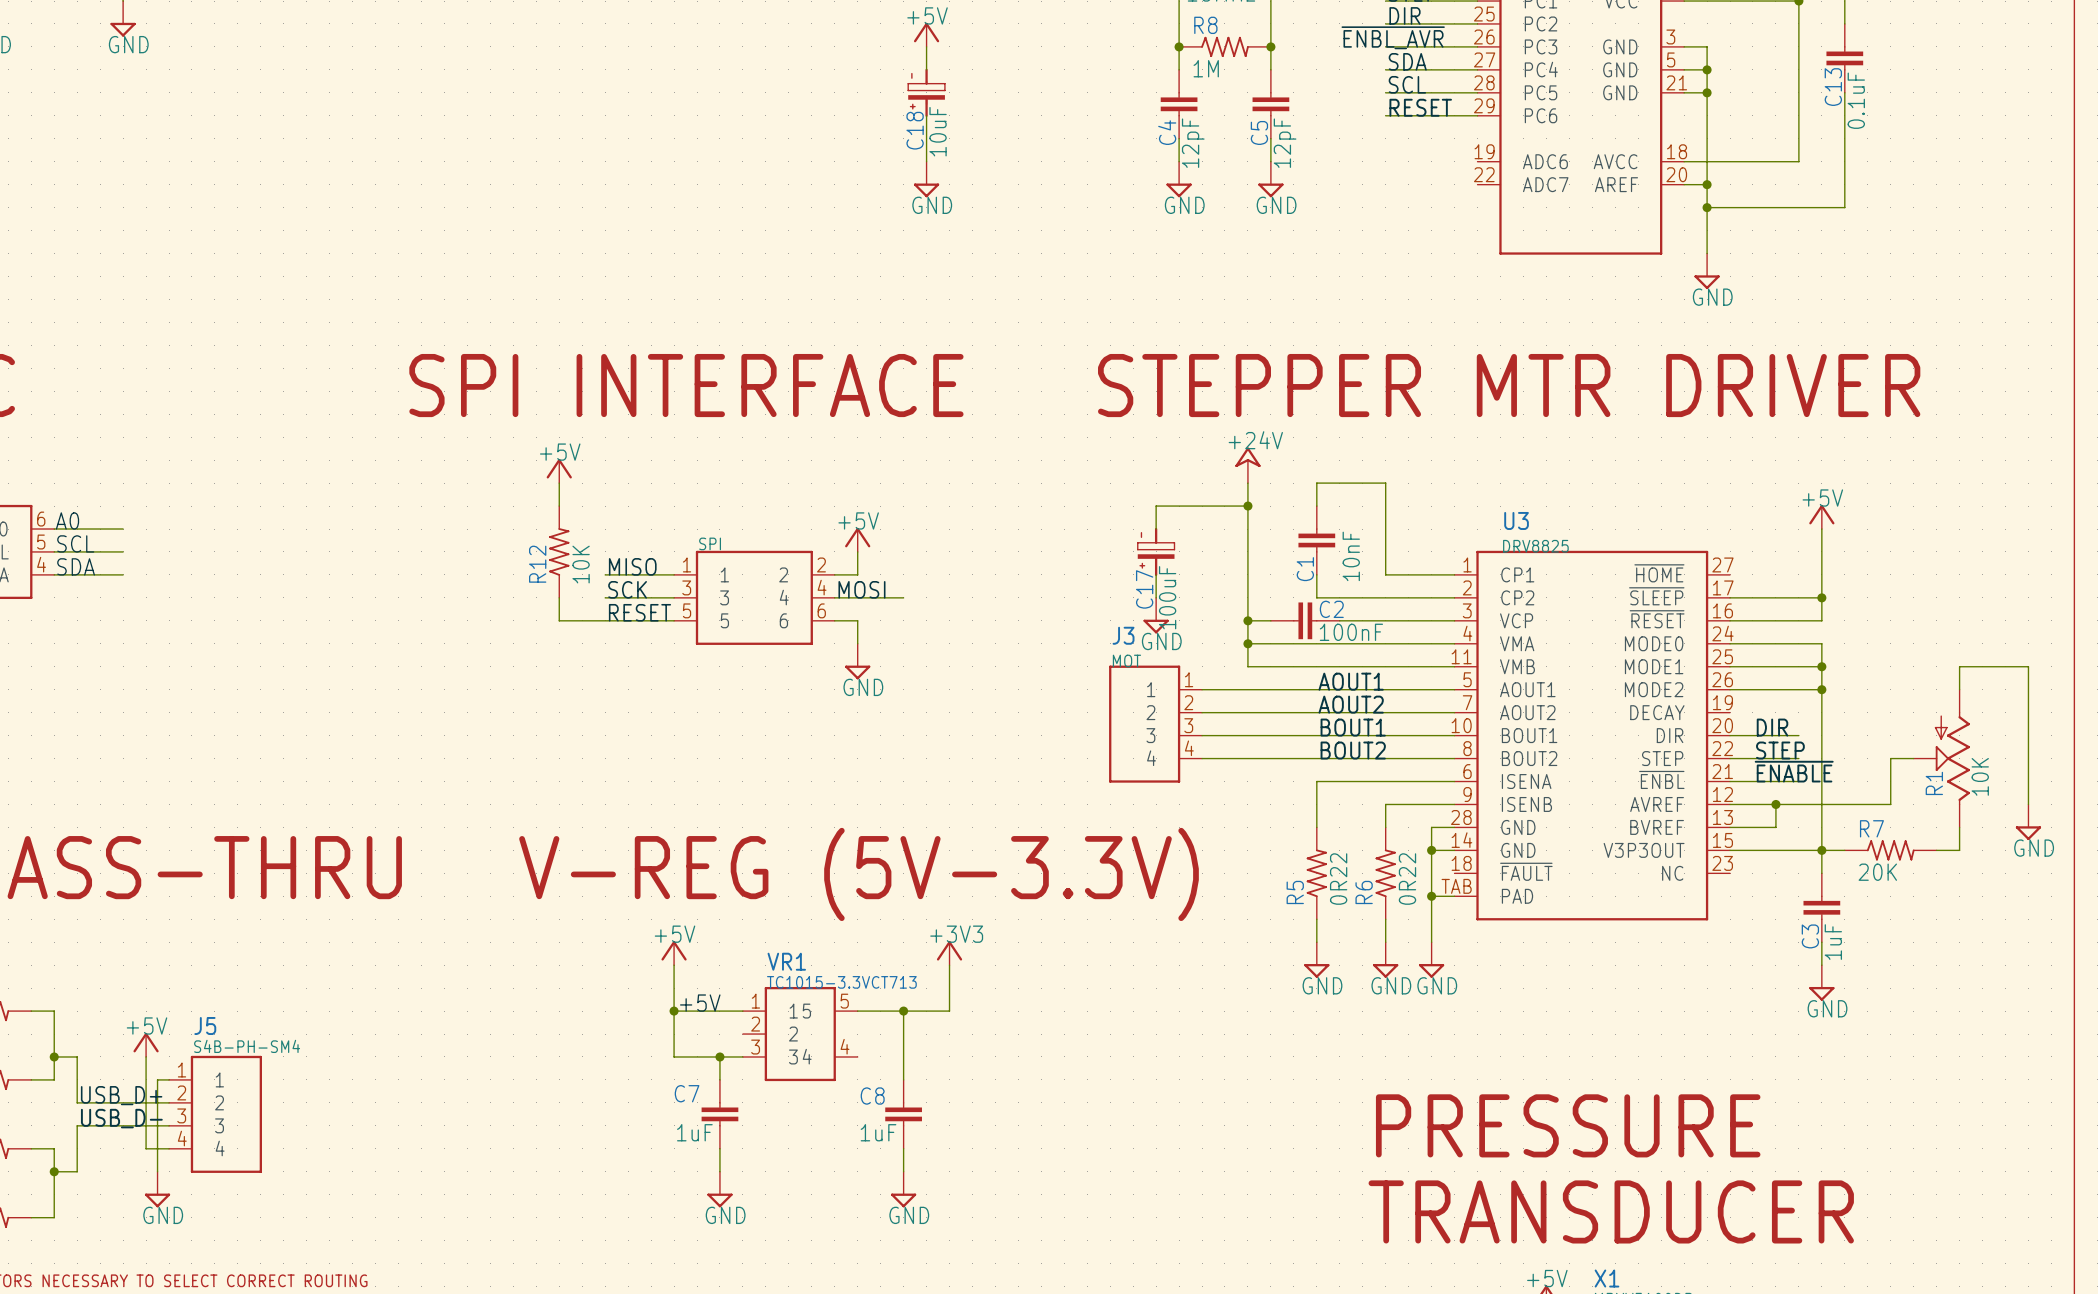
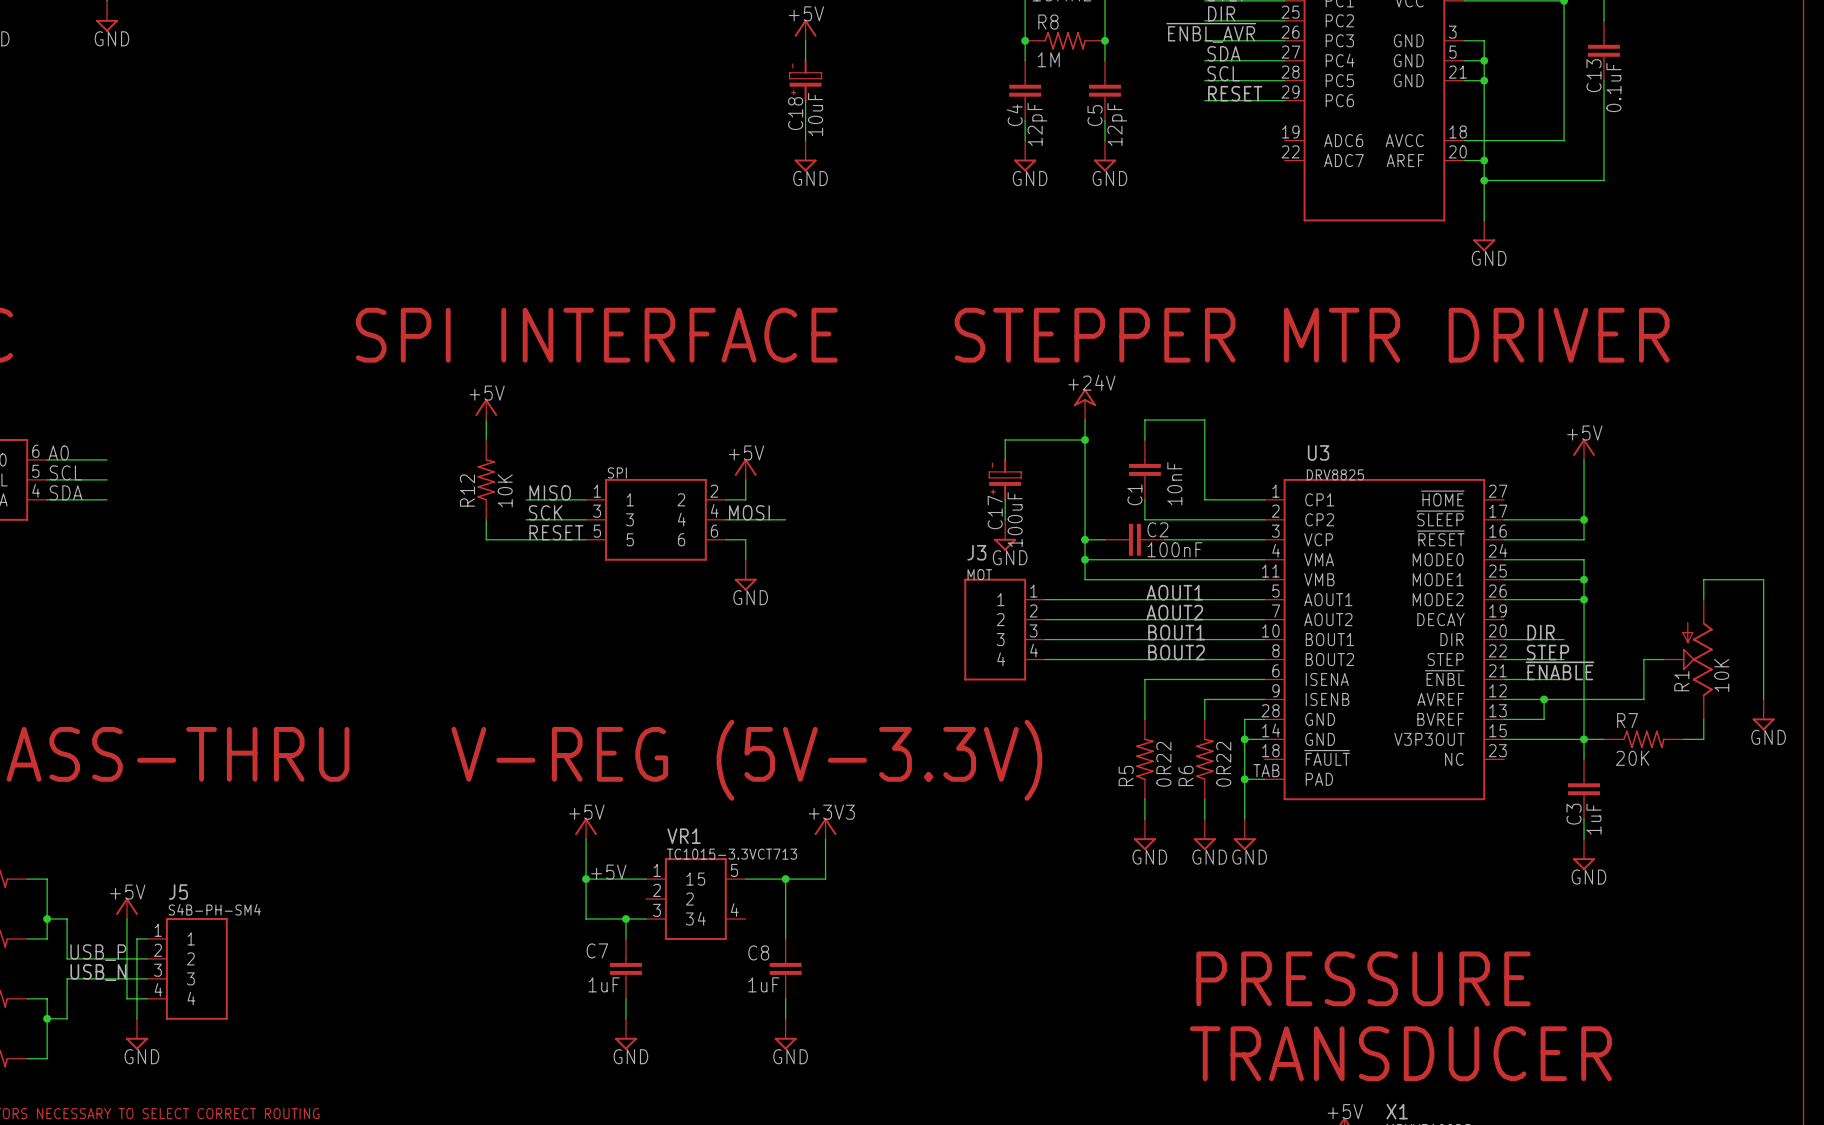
label: USB_D+ (121, 1095) -> USB_P (98, 952)
label: USB_D- (121, 1118) -> USB_N (98, 972)

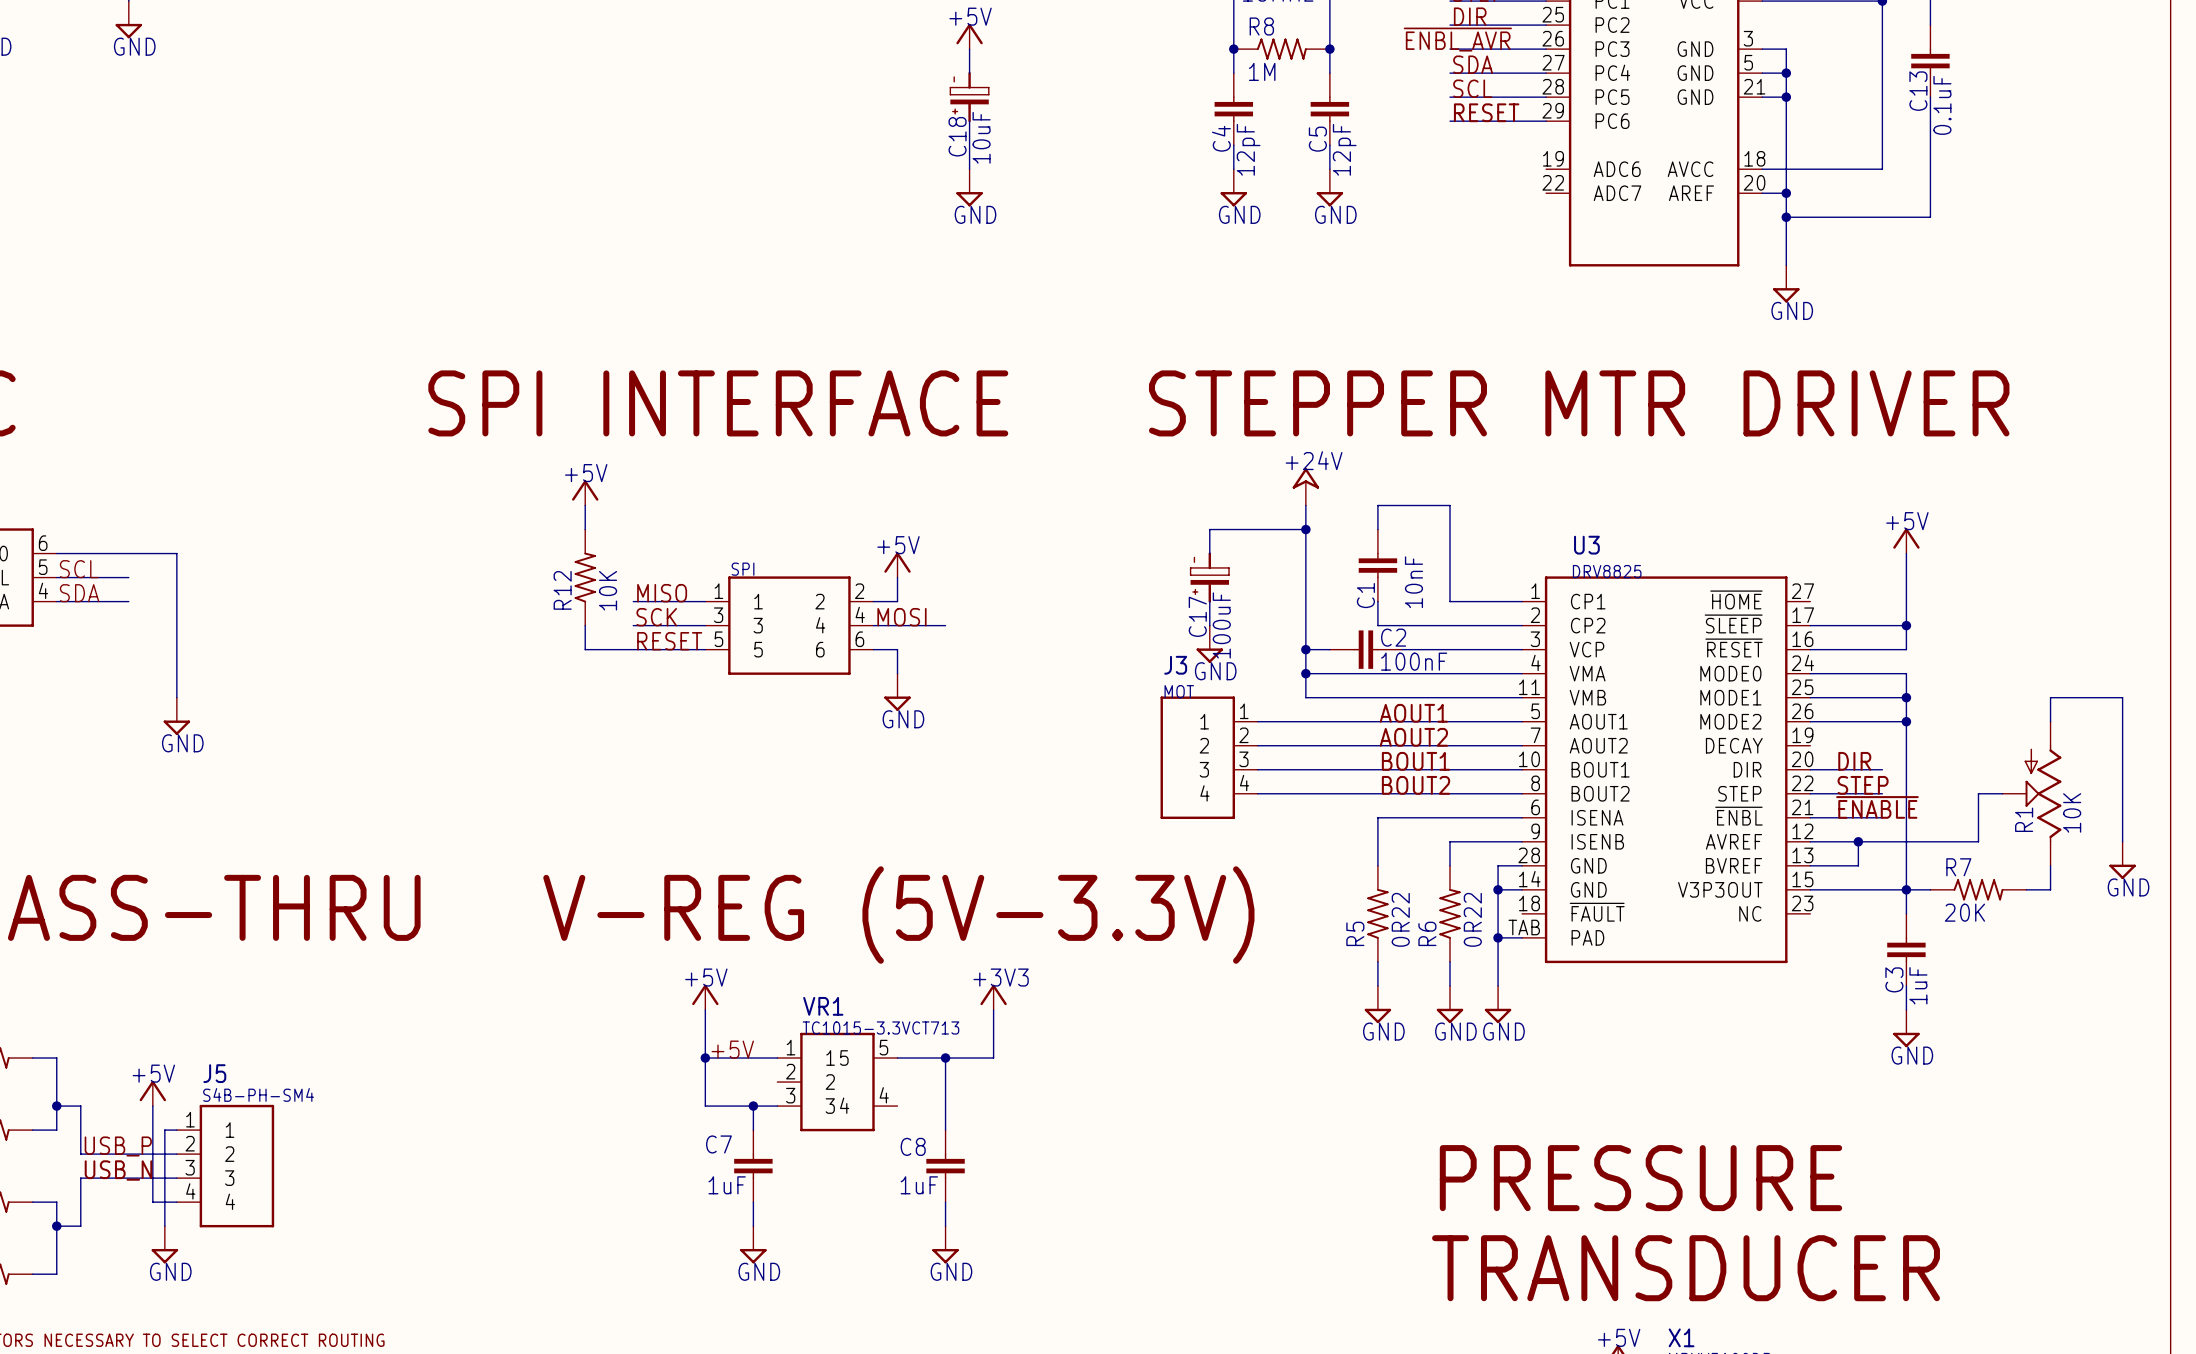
label: A0 (58, 452) -> none
wire: none -> (128, 553) (176, 553) (176, 697)
power symbol: none -> GND (176, 716)

